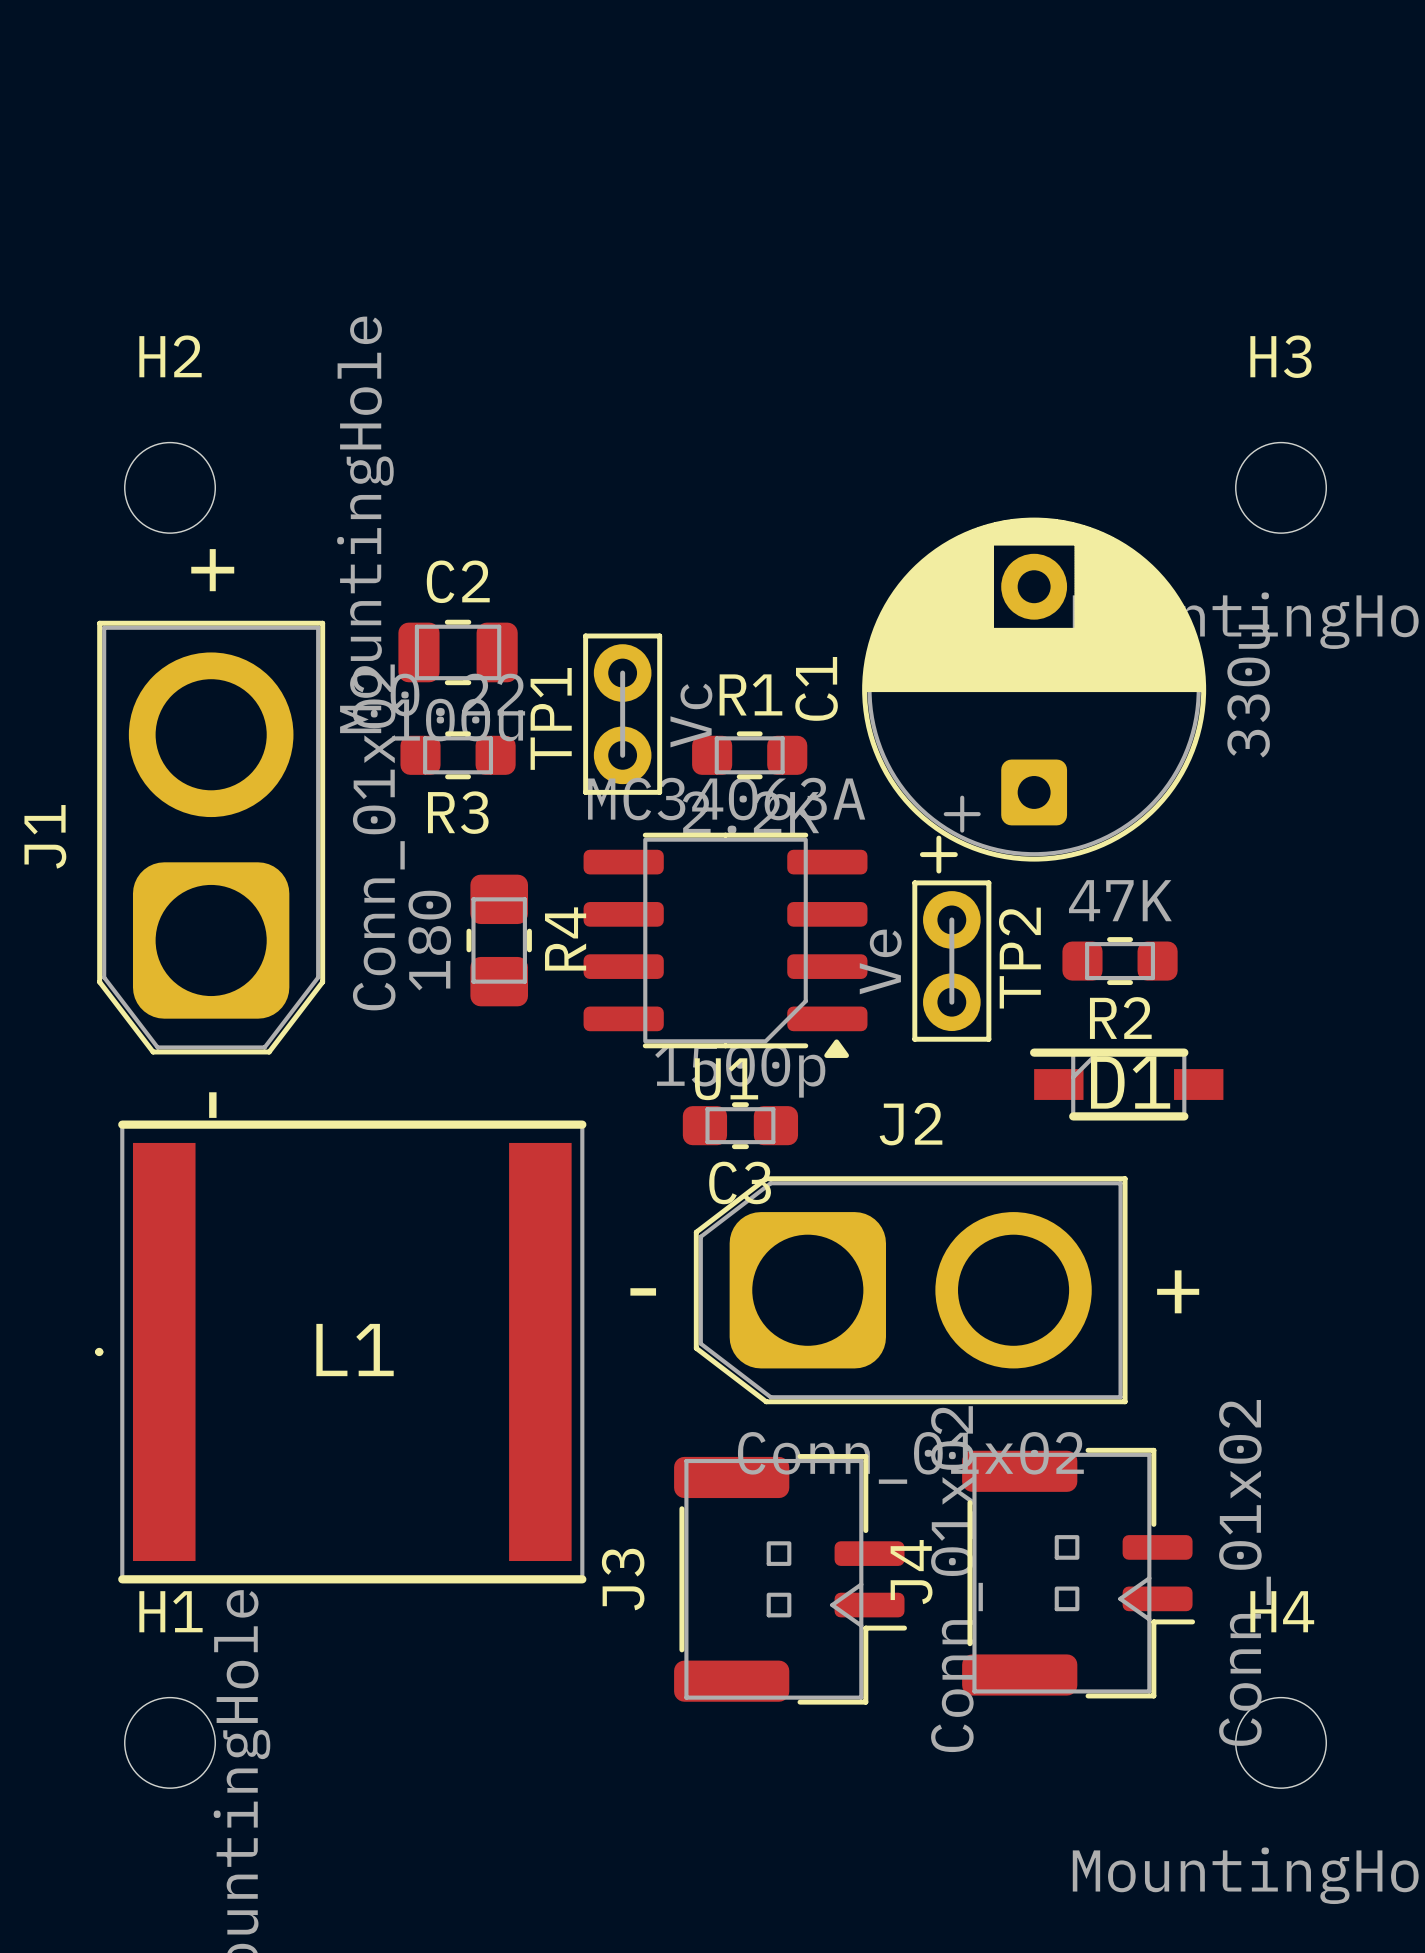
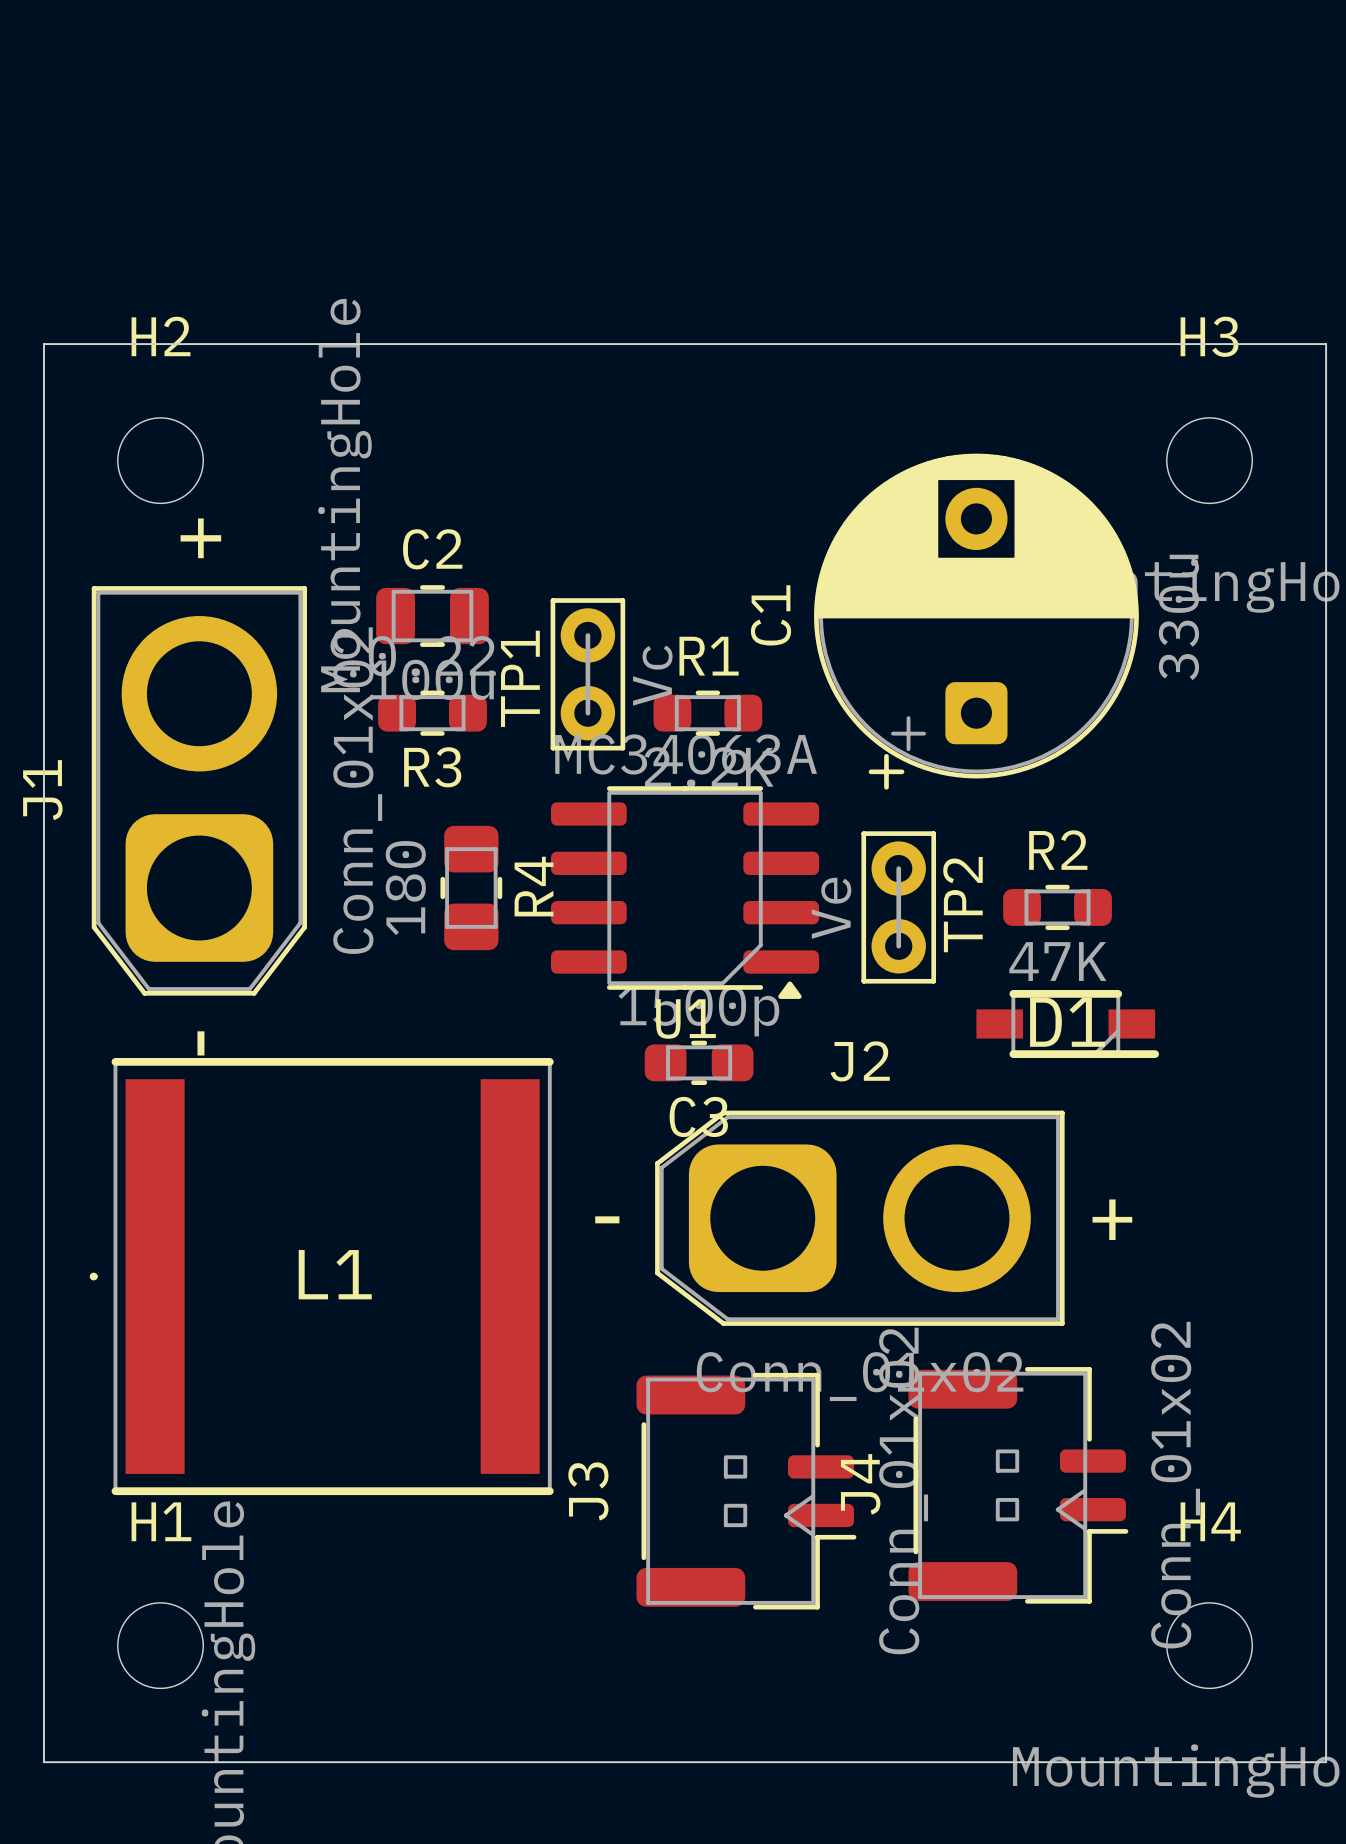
board edge: none -> (43, 344) (1326, 344) (1326, 1762) (43, 1762) (43, 344)
C1 position: (1034, 695) -> (976, 621)
R2 value position: 47K (1120, 900) -> 47K (1057, 961)
R2 name position: R2 (1120, 1018) -> R2 (1058, 850)
D1 rotation: 0° (1126, 1084) -> 180° (1067, 1023)

